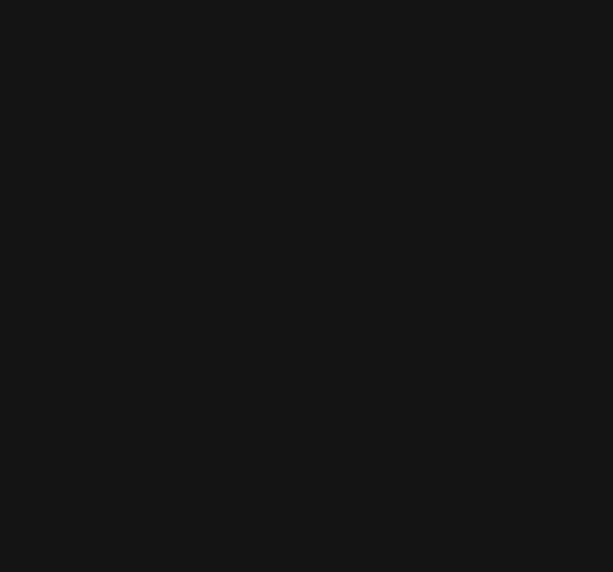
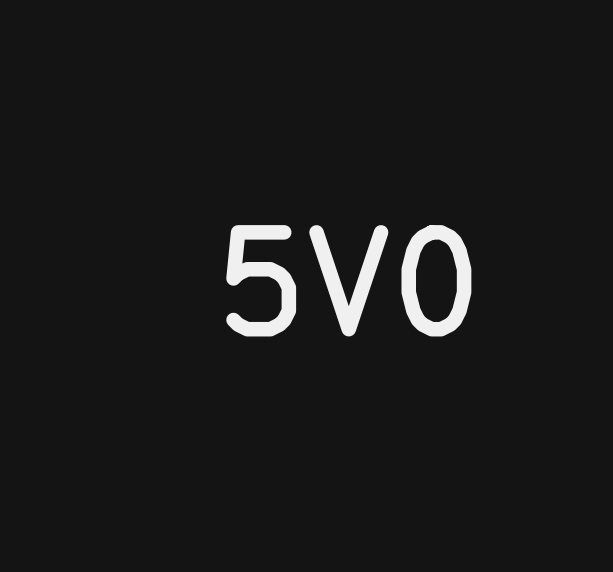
text: none -> 5V0 (348, 280)

